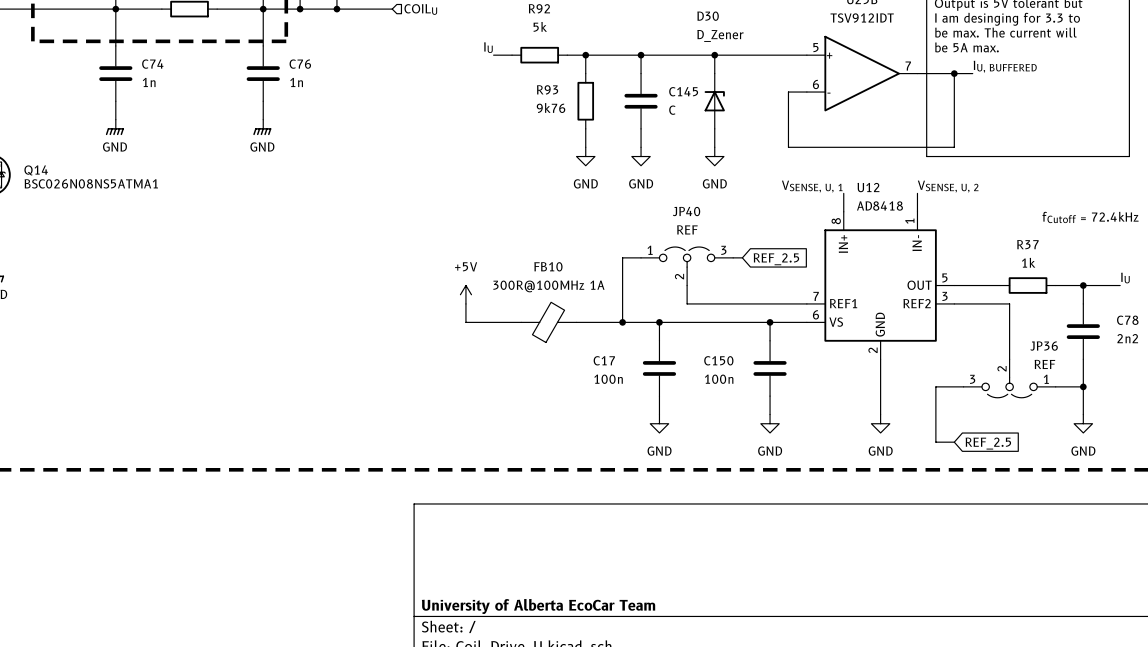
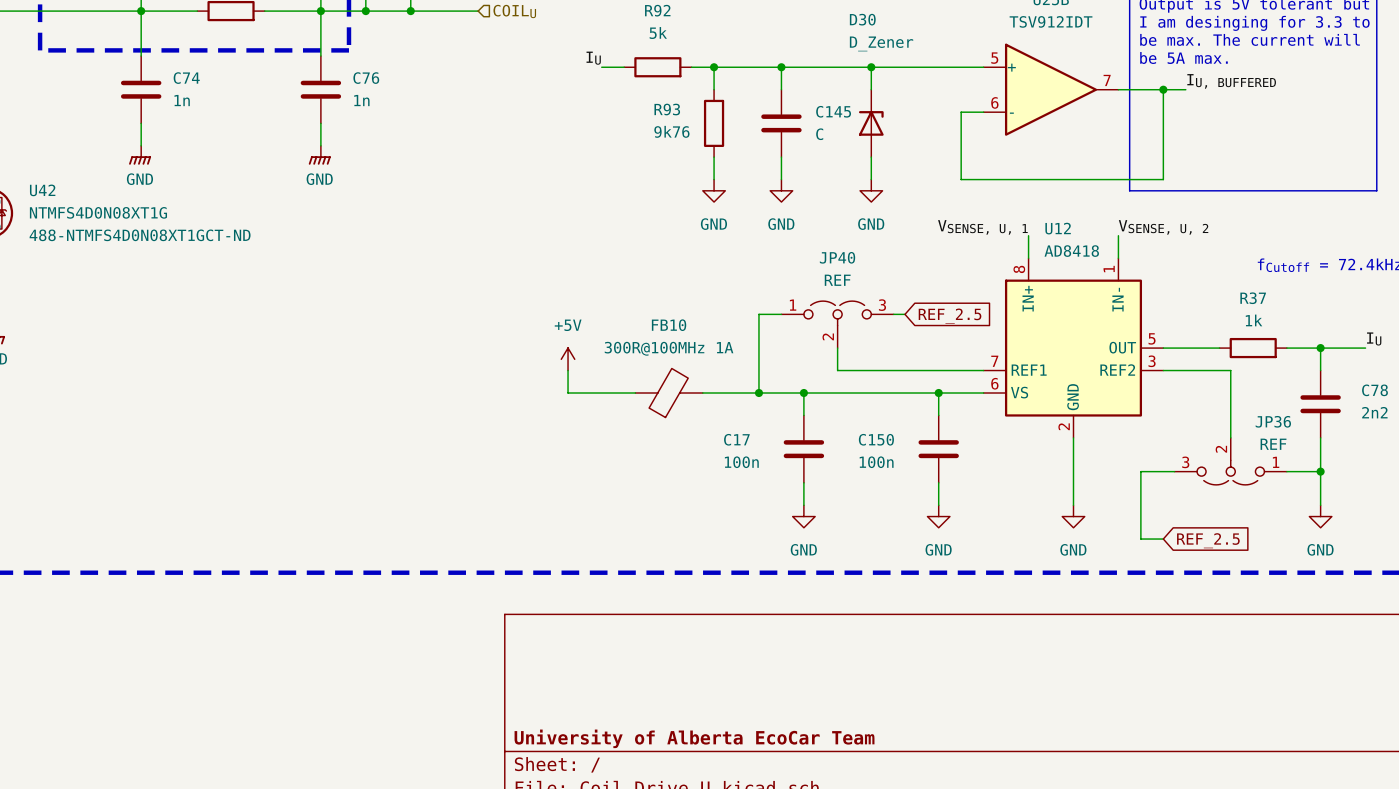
Q14 name: Q14 (36, 170) -> U42 (42, 190)
Q14 value: BSC026N08NS5ATMA1 (91, 183) -> NTMFS4D0N08XT1G (98, 212)
Q14 text: none -> 488-NTMFS4D0N08XT1GCT-ND (140, 235)

